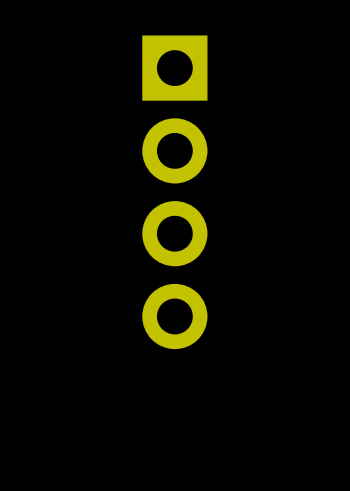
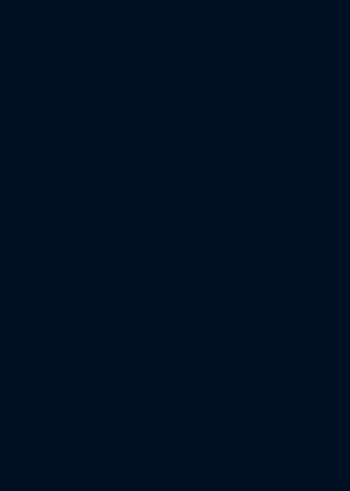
part: (174, 192) -> none

